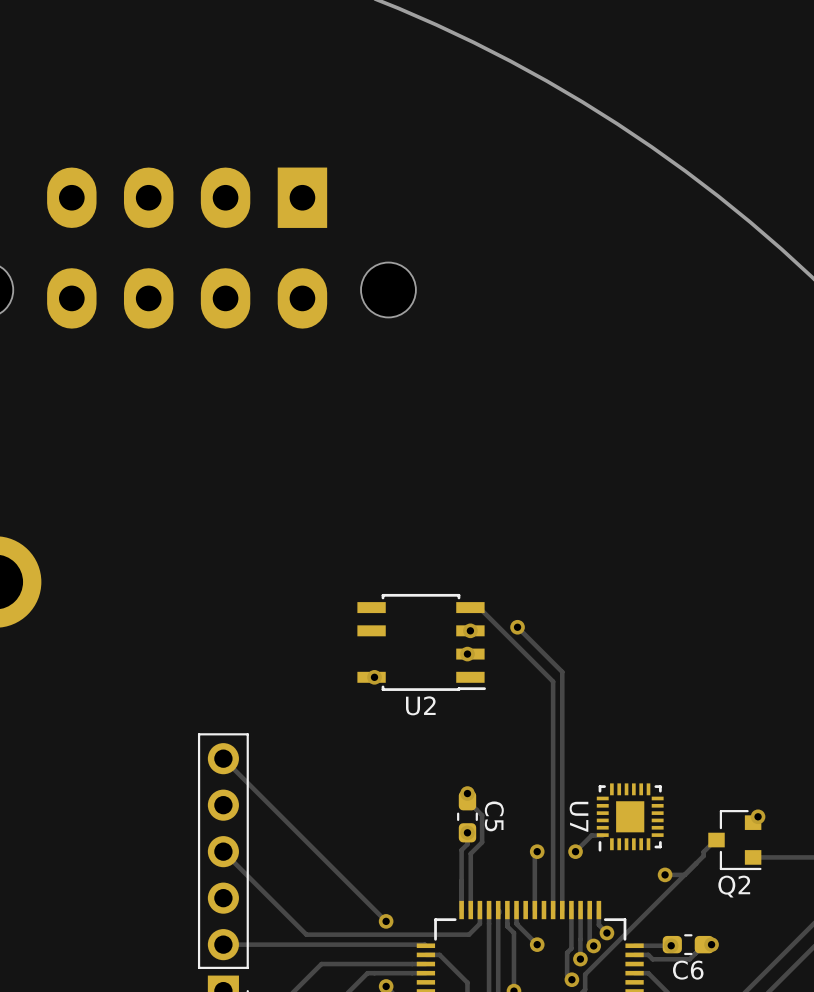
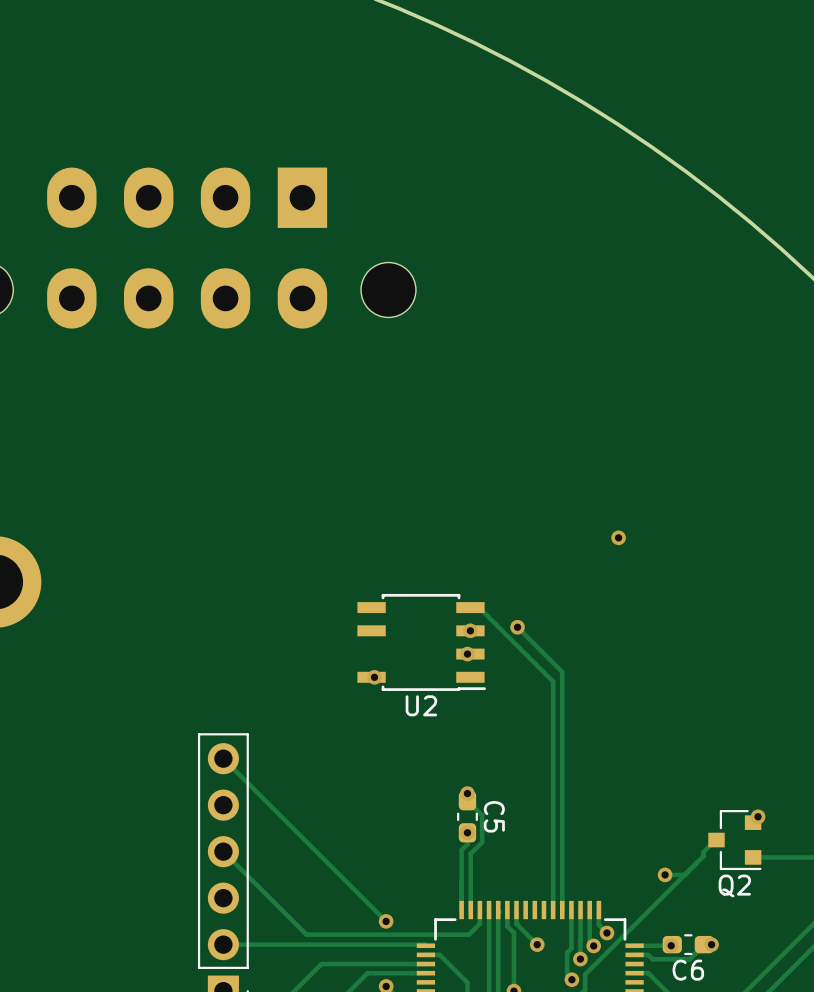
via: none -> (618, 537)
U7: (630, 817) -> none
track: (602, 835) (591, 835) (575, 851) -> none
track: (537, 851) (534, 854) (534, 910) -> none
via: (537, 851) -> none
via: (575, 851) -> none

